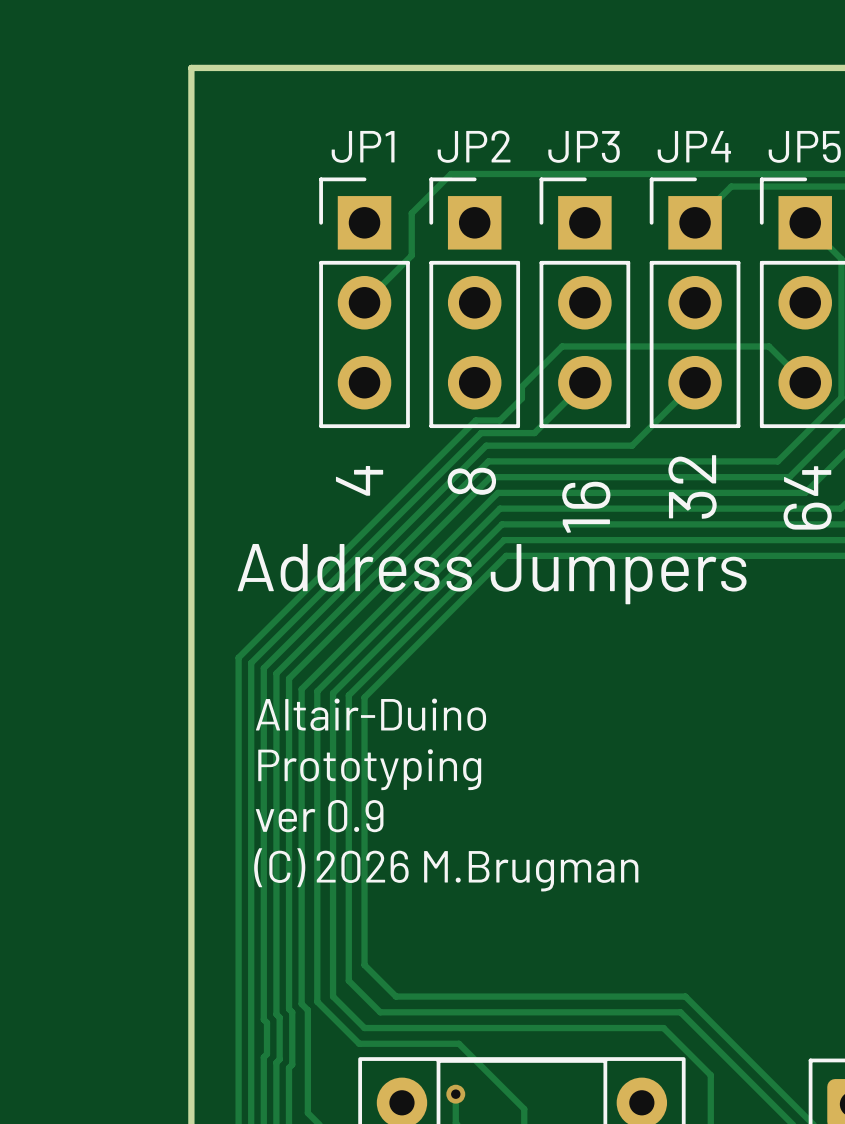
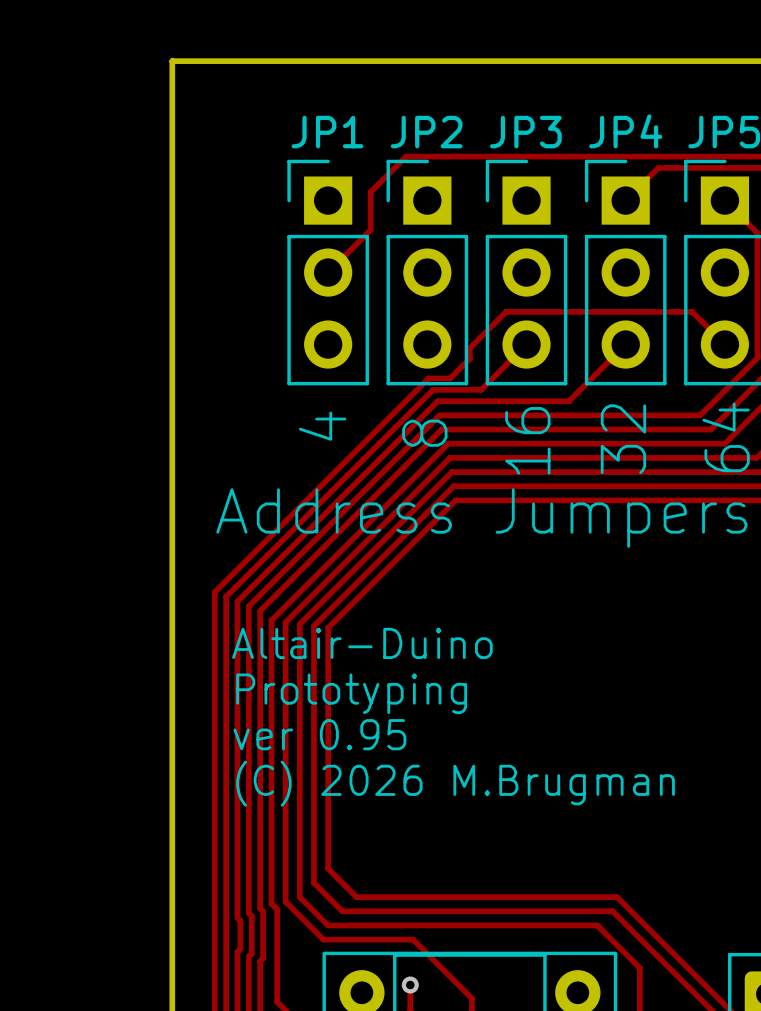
text: ver 0.9 (319, 816) -> ver 0.95 (319, 734)

